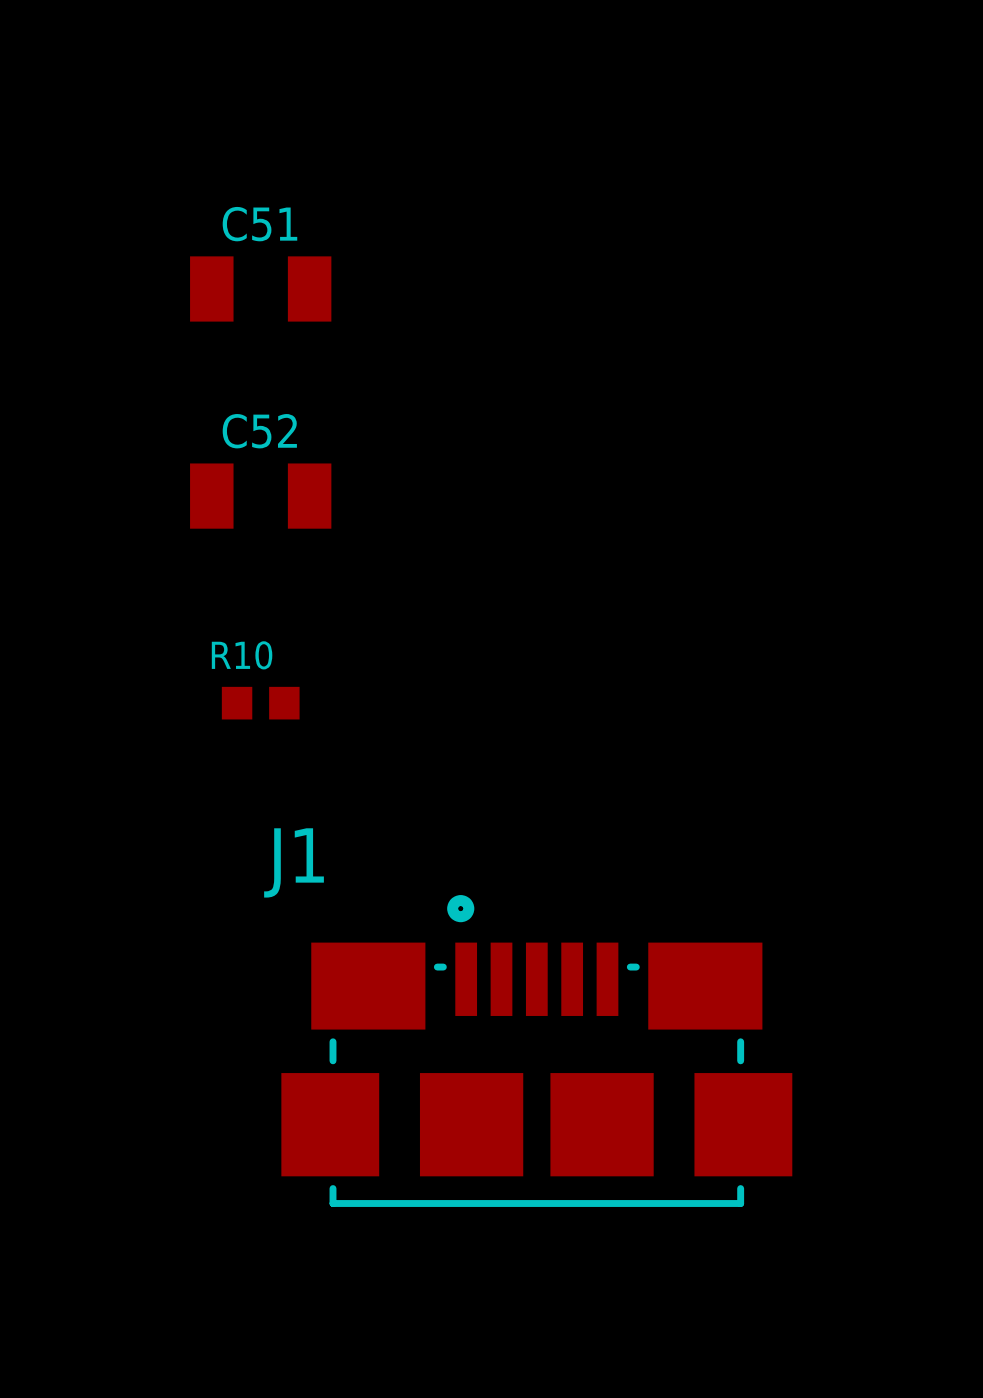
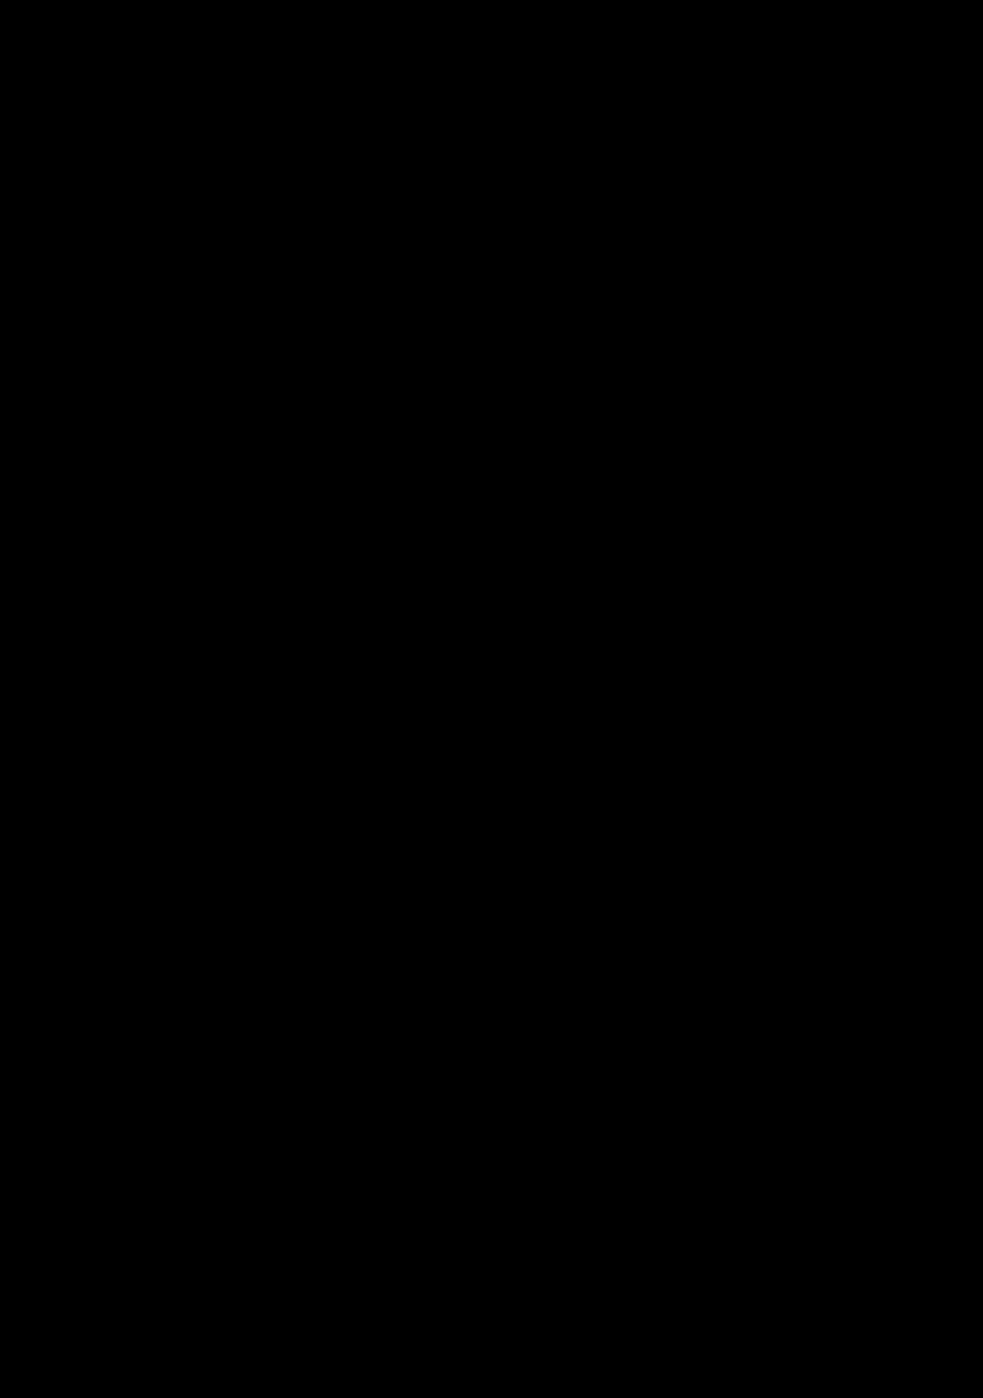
C51: (260, 288) -> none
C52: (260, 496) -> none
R10: (260, 703) -> none
J1: (536, 1050) -> none

